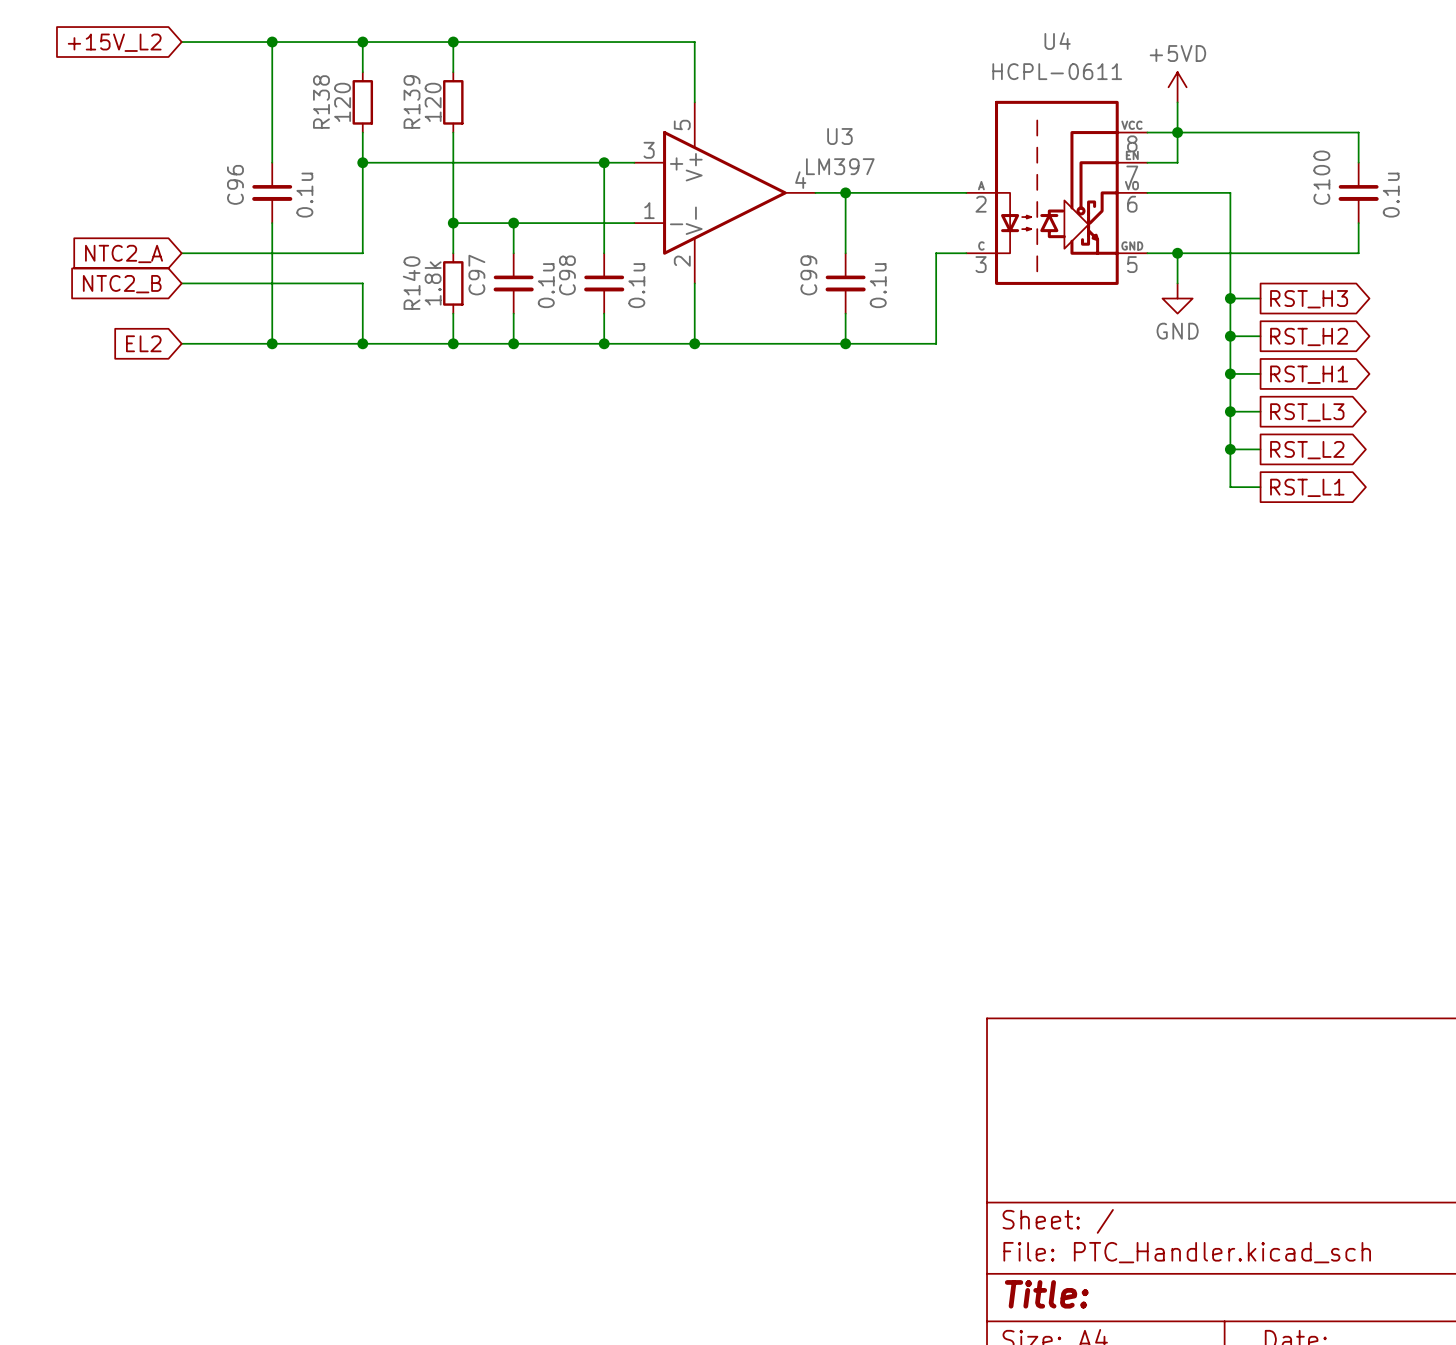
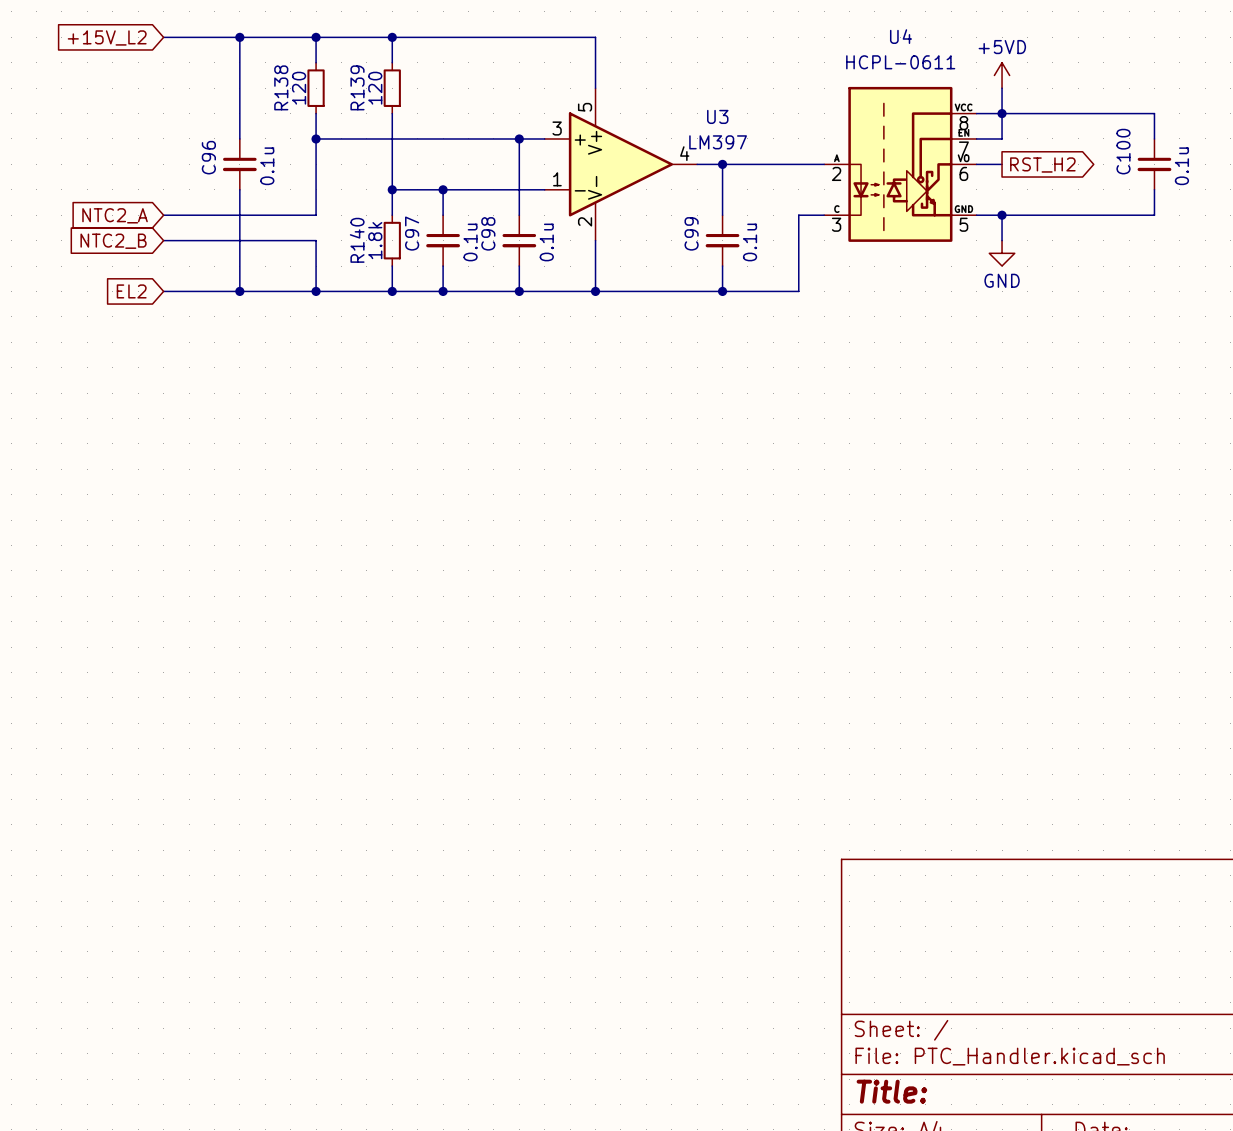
wire: (1177, 192) (1230, 192) (1230, 487) (1260, 487) -> none
wire: (1230, 298) (1260, 298) -> none
junction: (1230, 298) -> none
global label: RST_H3 (1309, 299) -> none
wire: (1230, 336) (1260, 336) -> none
junction: (1230, 336) -> none
global label position: RST_H2 (1309, 336) -> RST_H2 (1042, 165)
wire: (1230, 373) (1260, 373) -> none
junction: (1230, 373) -> none
global label: RST_H1 (1309, 374) -> none
wire: (1230, 411) (1260, 411) -> none
junction: (1230, 411) -> none
global label: RST_L3 (1307, 412) -> none
wire: (1230, 449) (1260, 449) -> none
junction: (1230, 449) -> none
global label: RST_L2 (1307, 450) -> none
global label: RST_L1 (1307, 487) -> none

